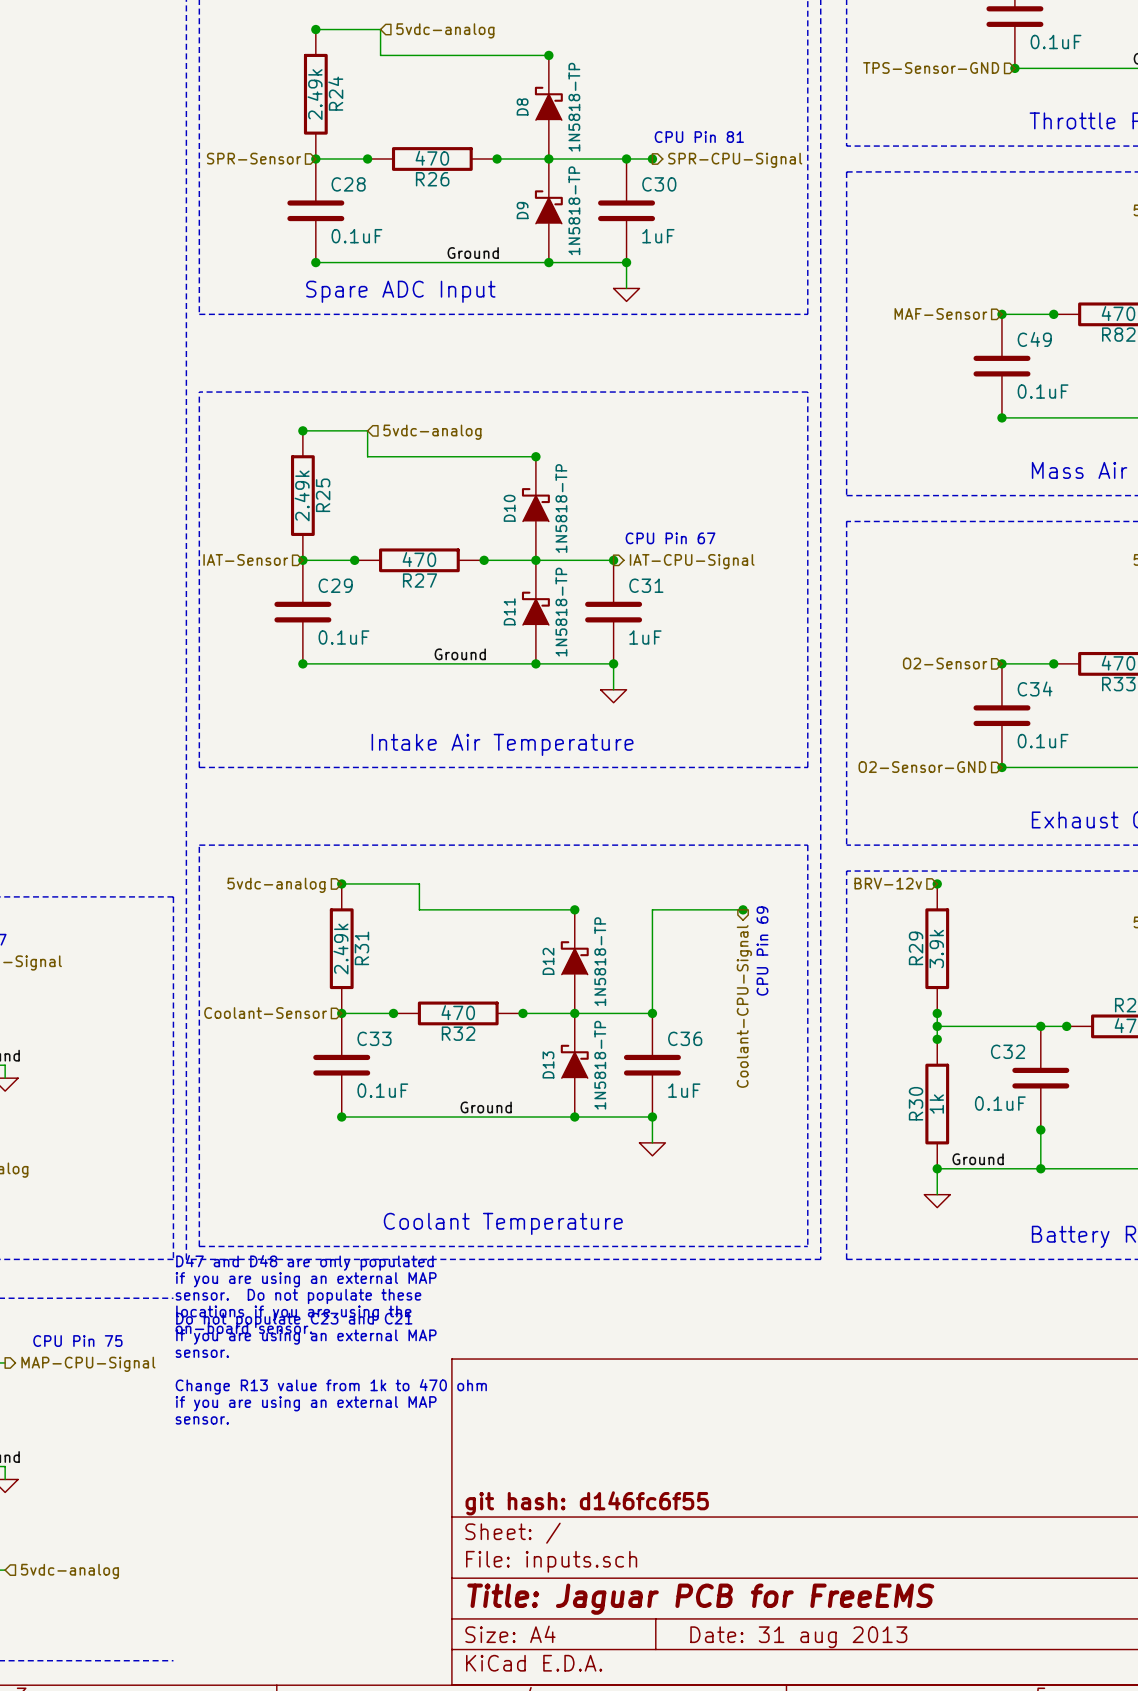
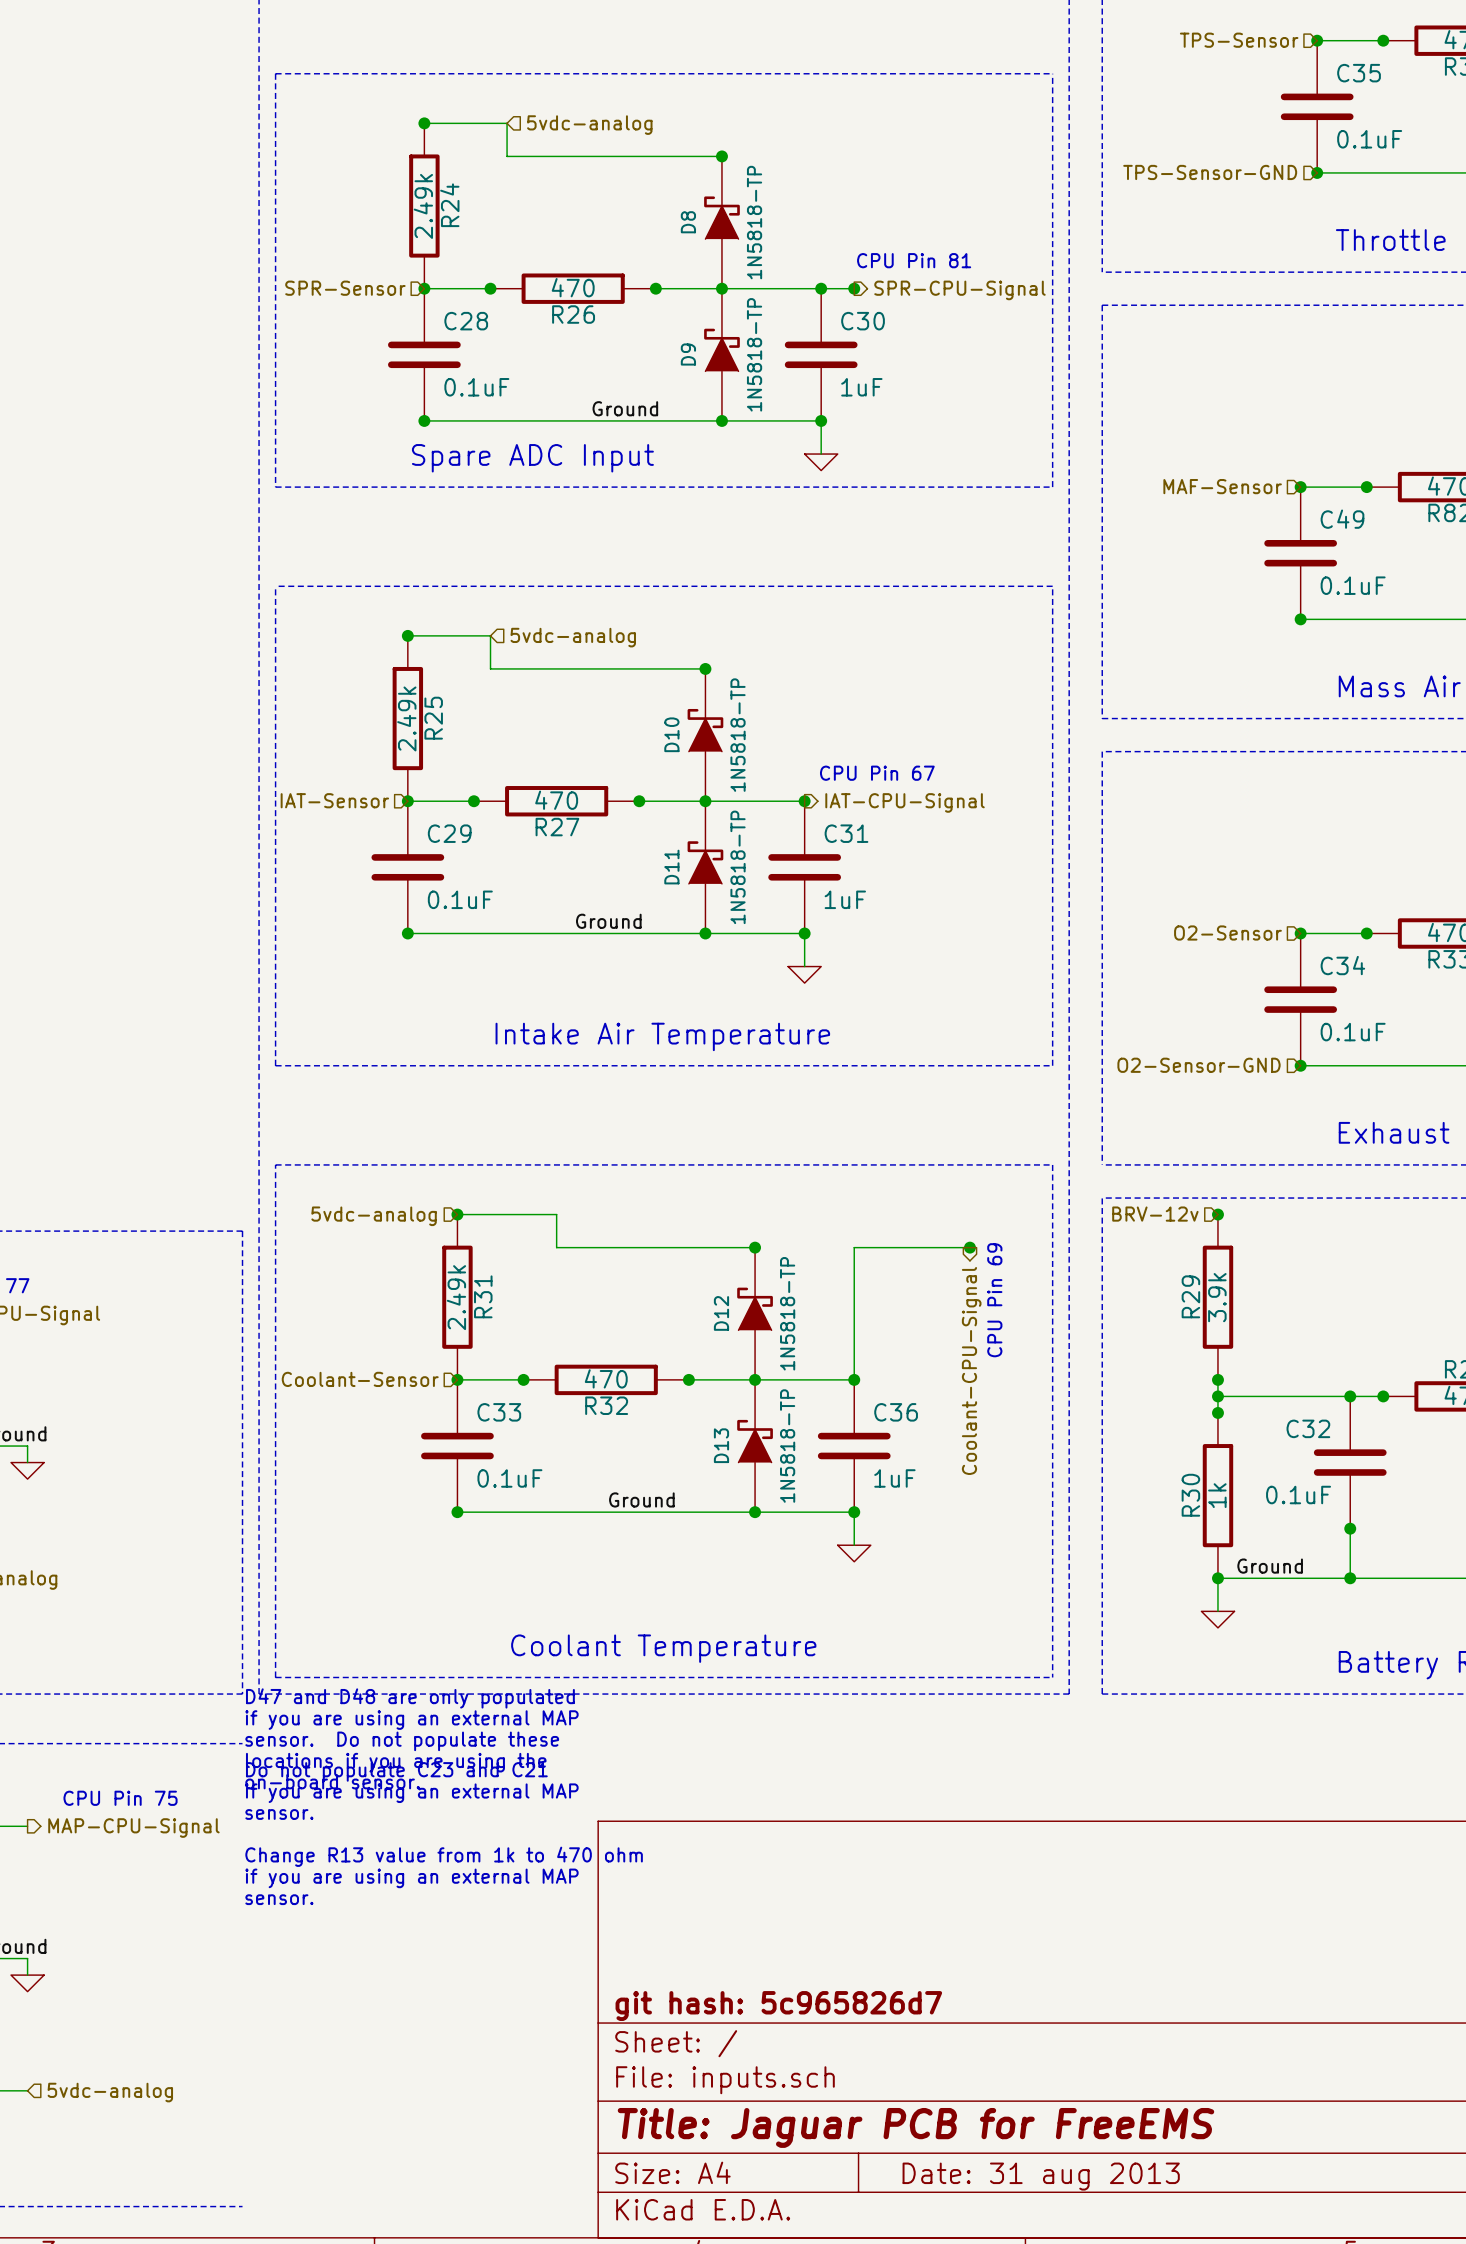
title block: git hash: d146fc6f55 (587, 1503) -> git hash: 5c965826d7 (778, 2006)

